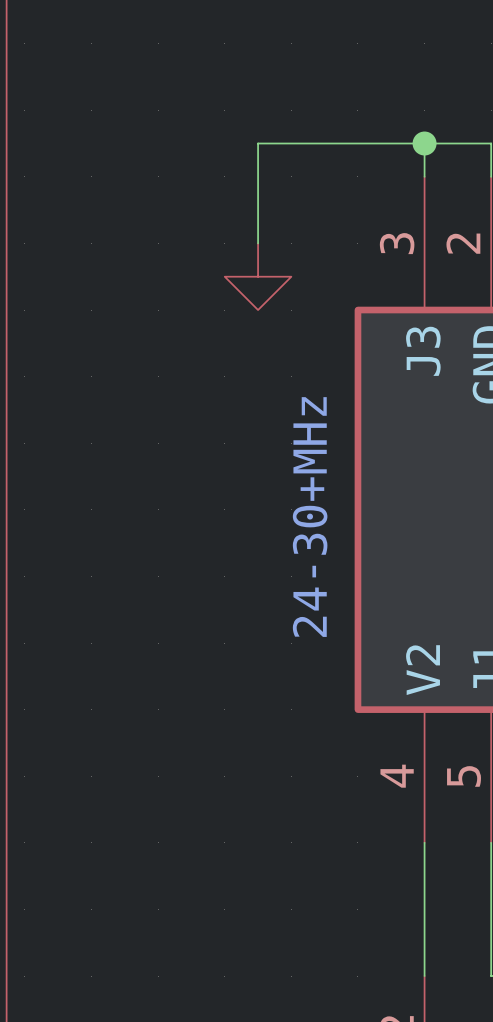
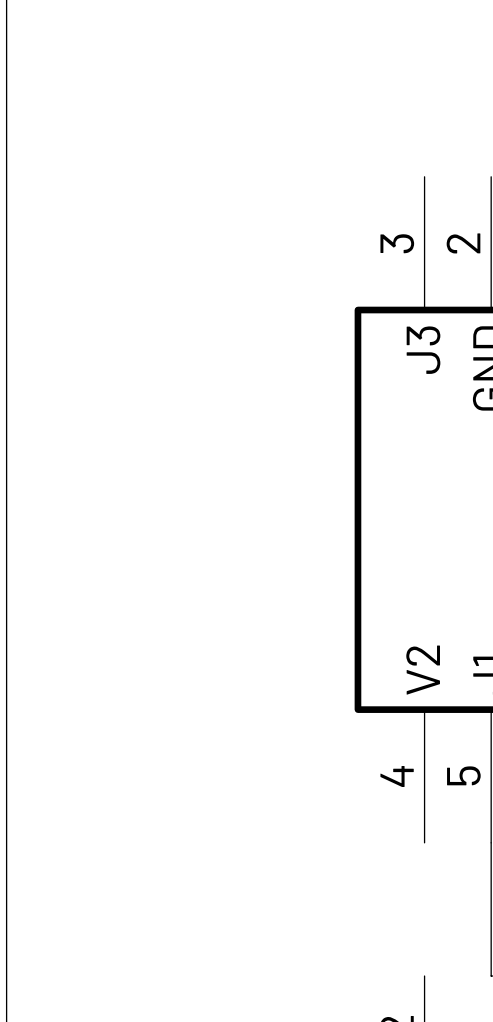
wire: (424, 143) (424, 176) -> none
junction: (424, 143) -> none
wire: (491, 176) (491, 143) (258, 143) (258, 243) -> none
power symbol: (258, 276) -> none
text: 24-30+MHz (310, 517) -> none
wire: (424, 842) (424, 976) -> none

